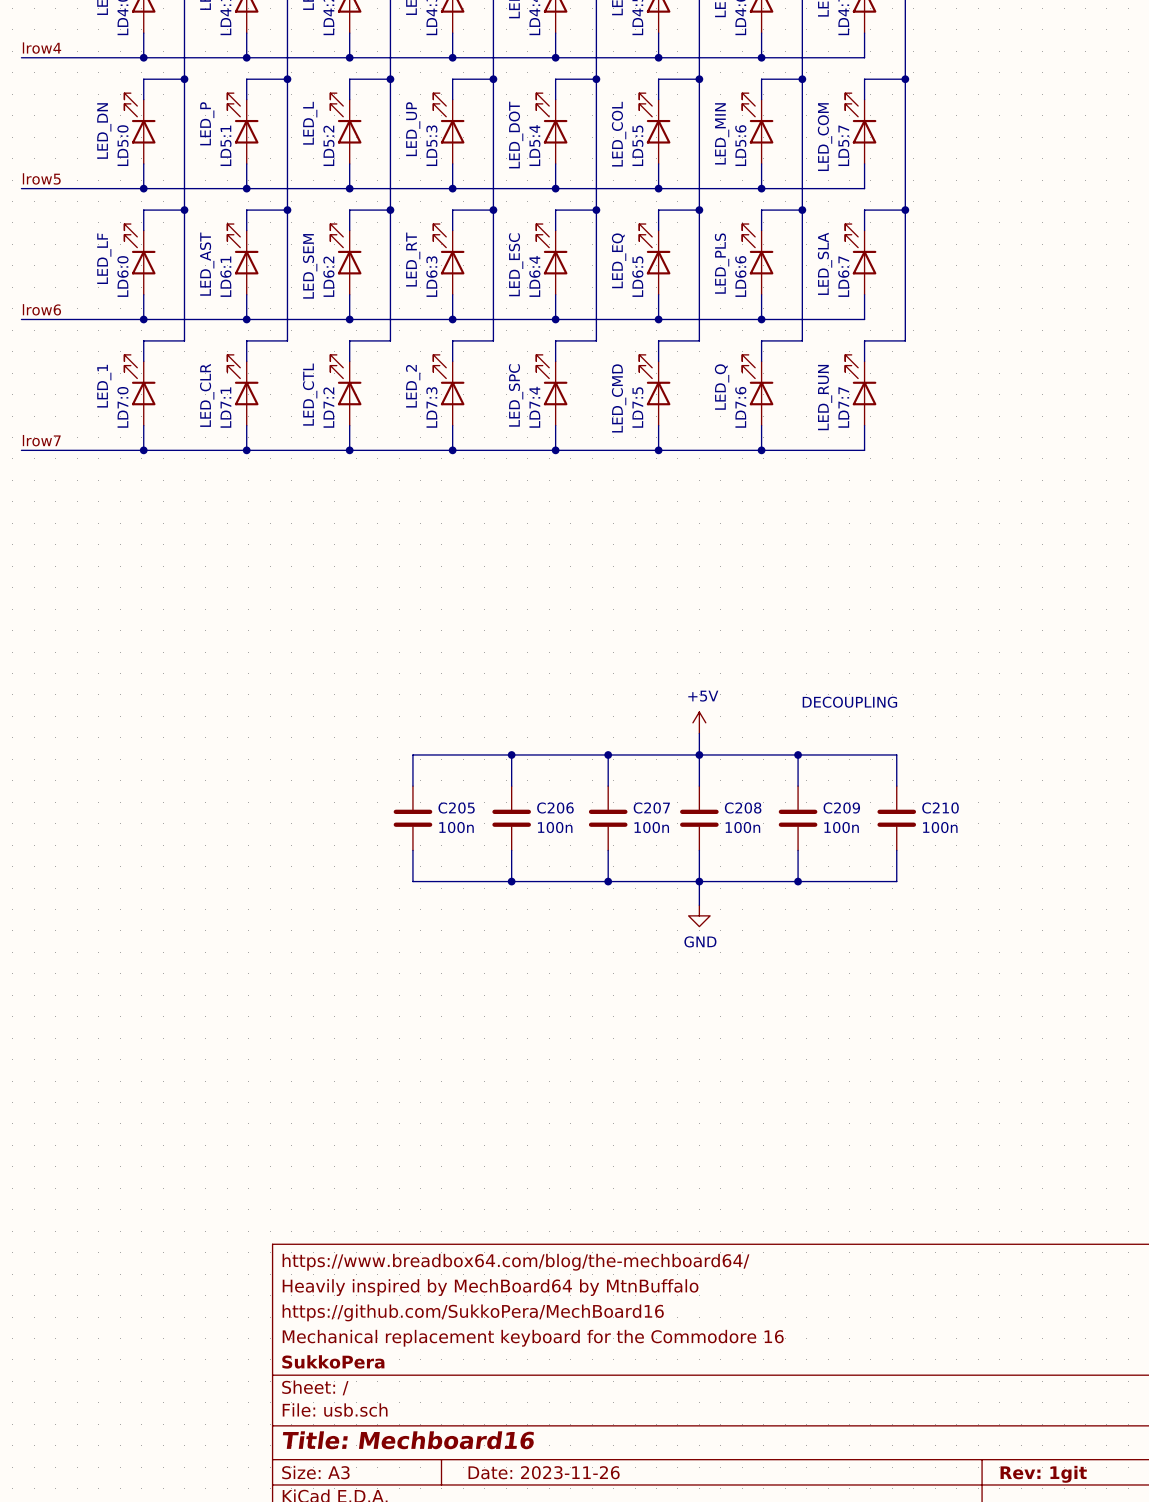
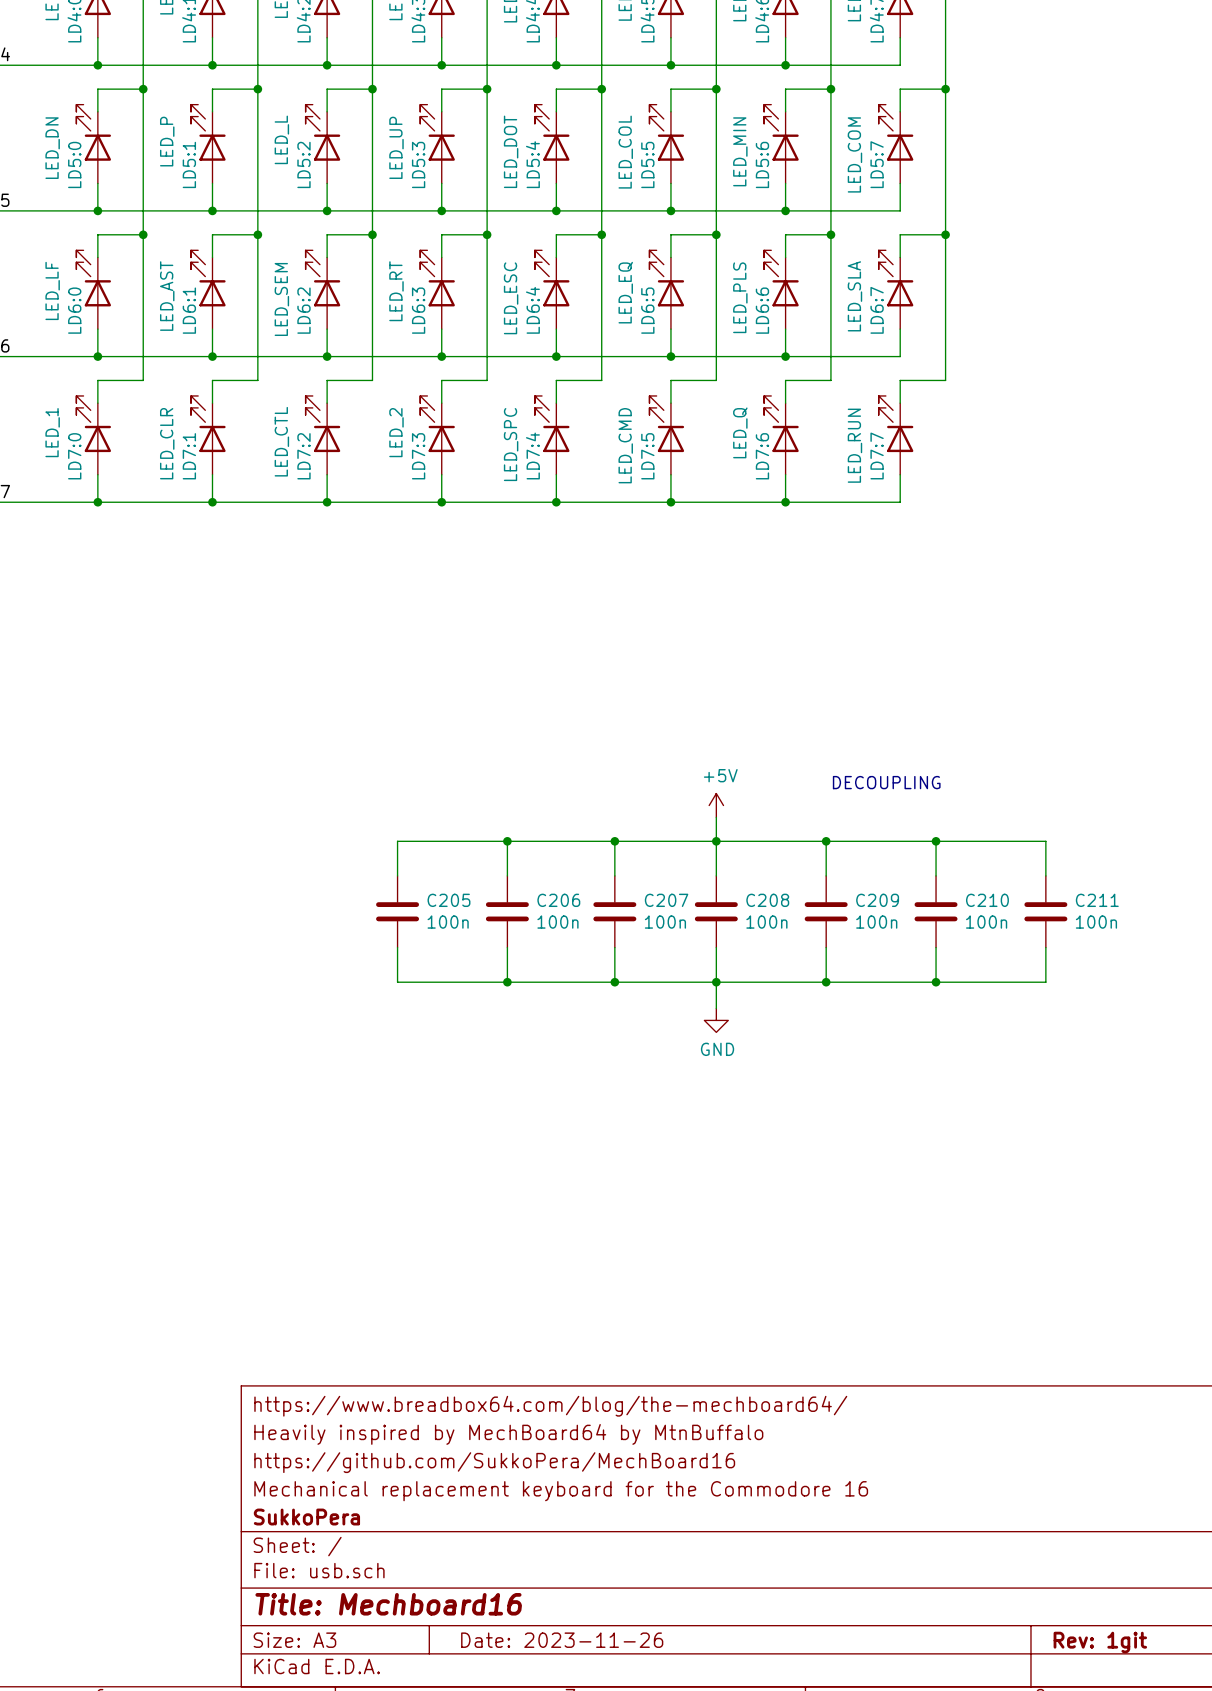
wire: none -> (936, 841) (1045, 841) (1045, 875)
junction: none -> (936, 841)
C211: none -> 100n (1045, 911)
wire: none -> (1045, 947) (1045, 982) (936, 982)
junction: none -> (936, 982)

